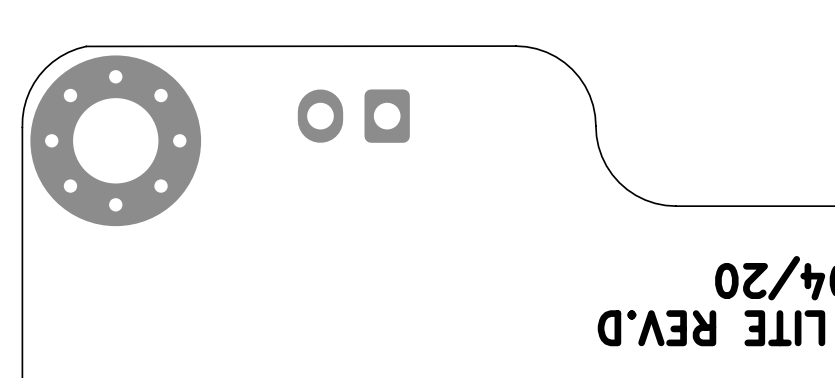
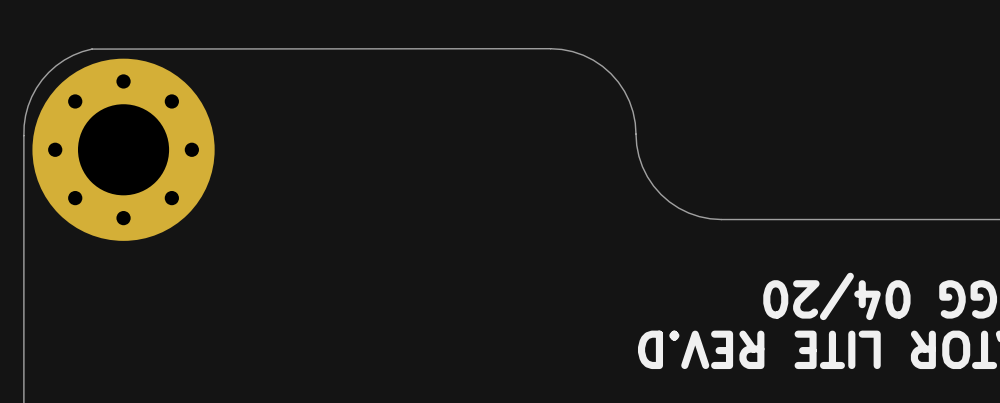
part: (353, 116) -> none

